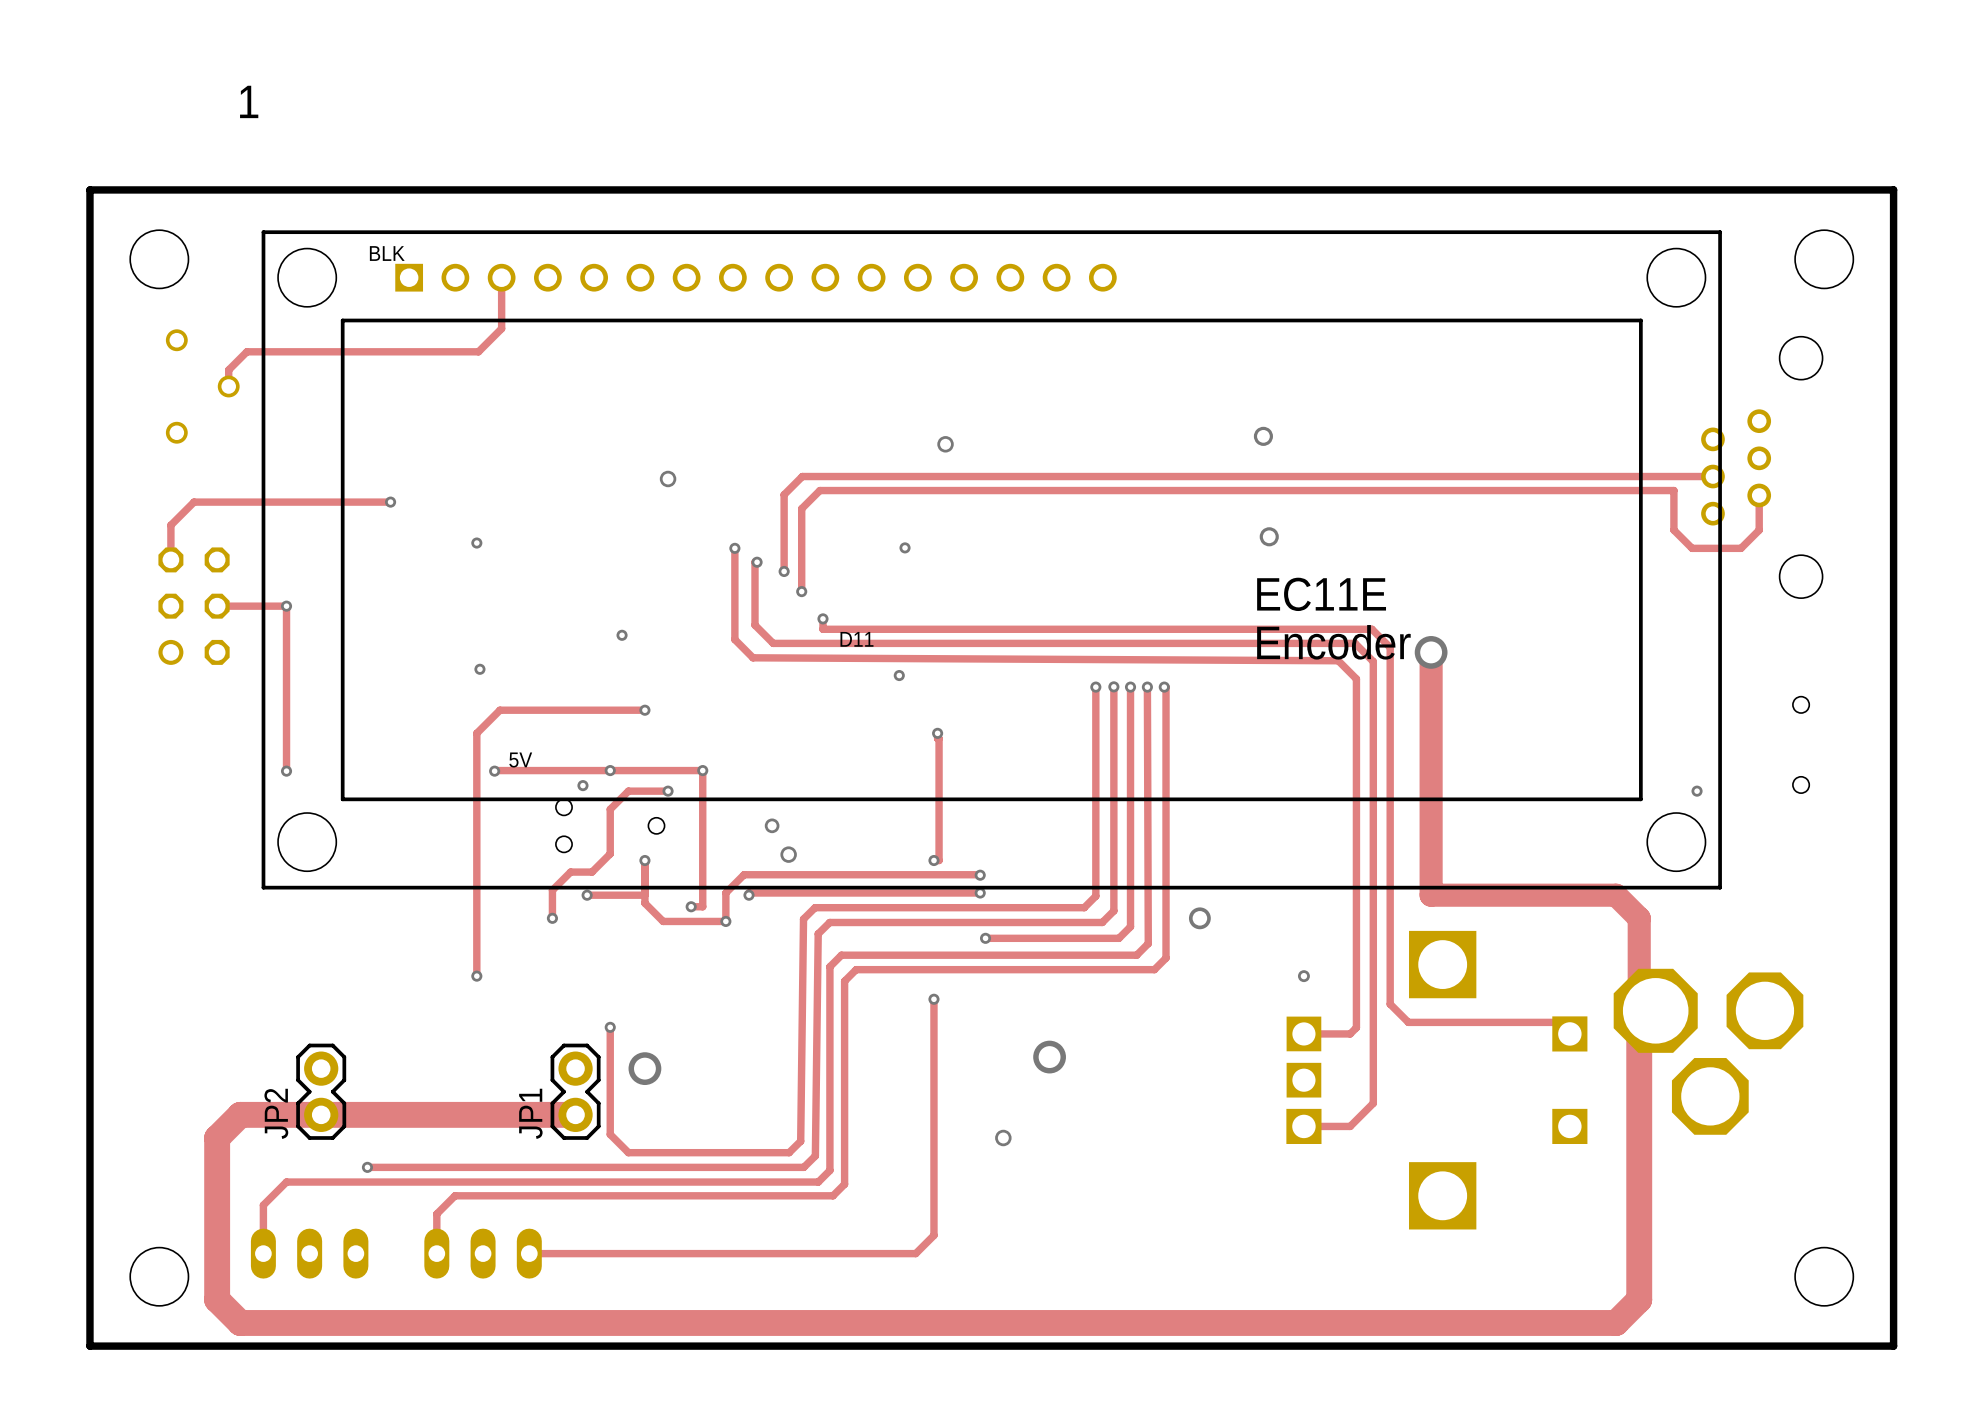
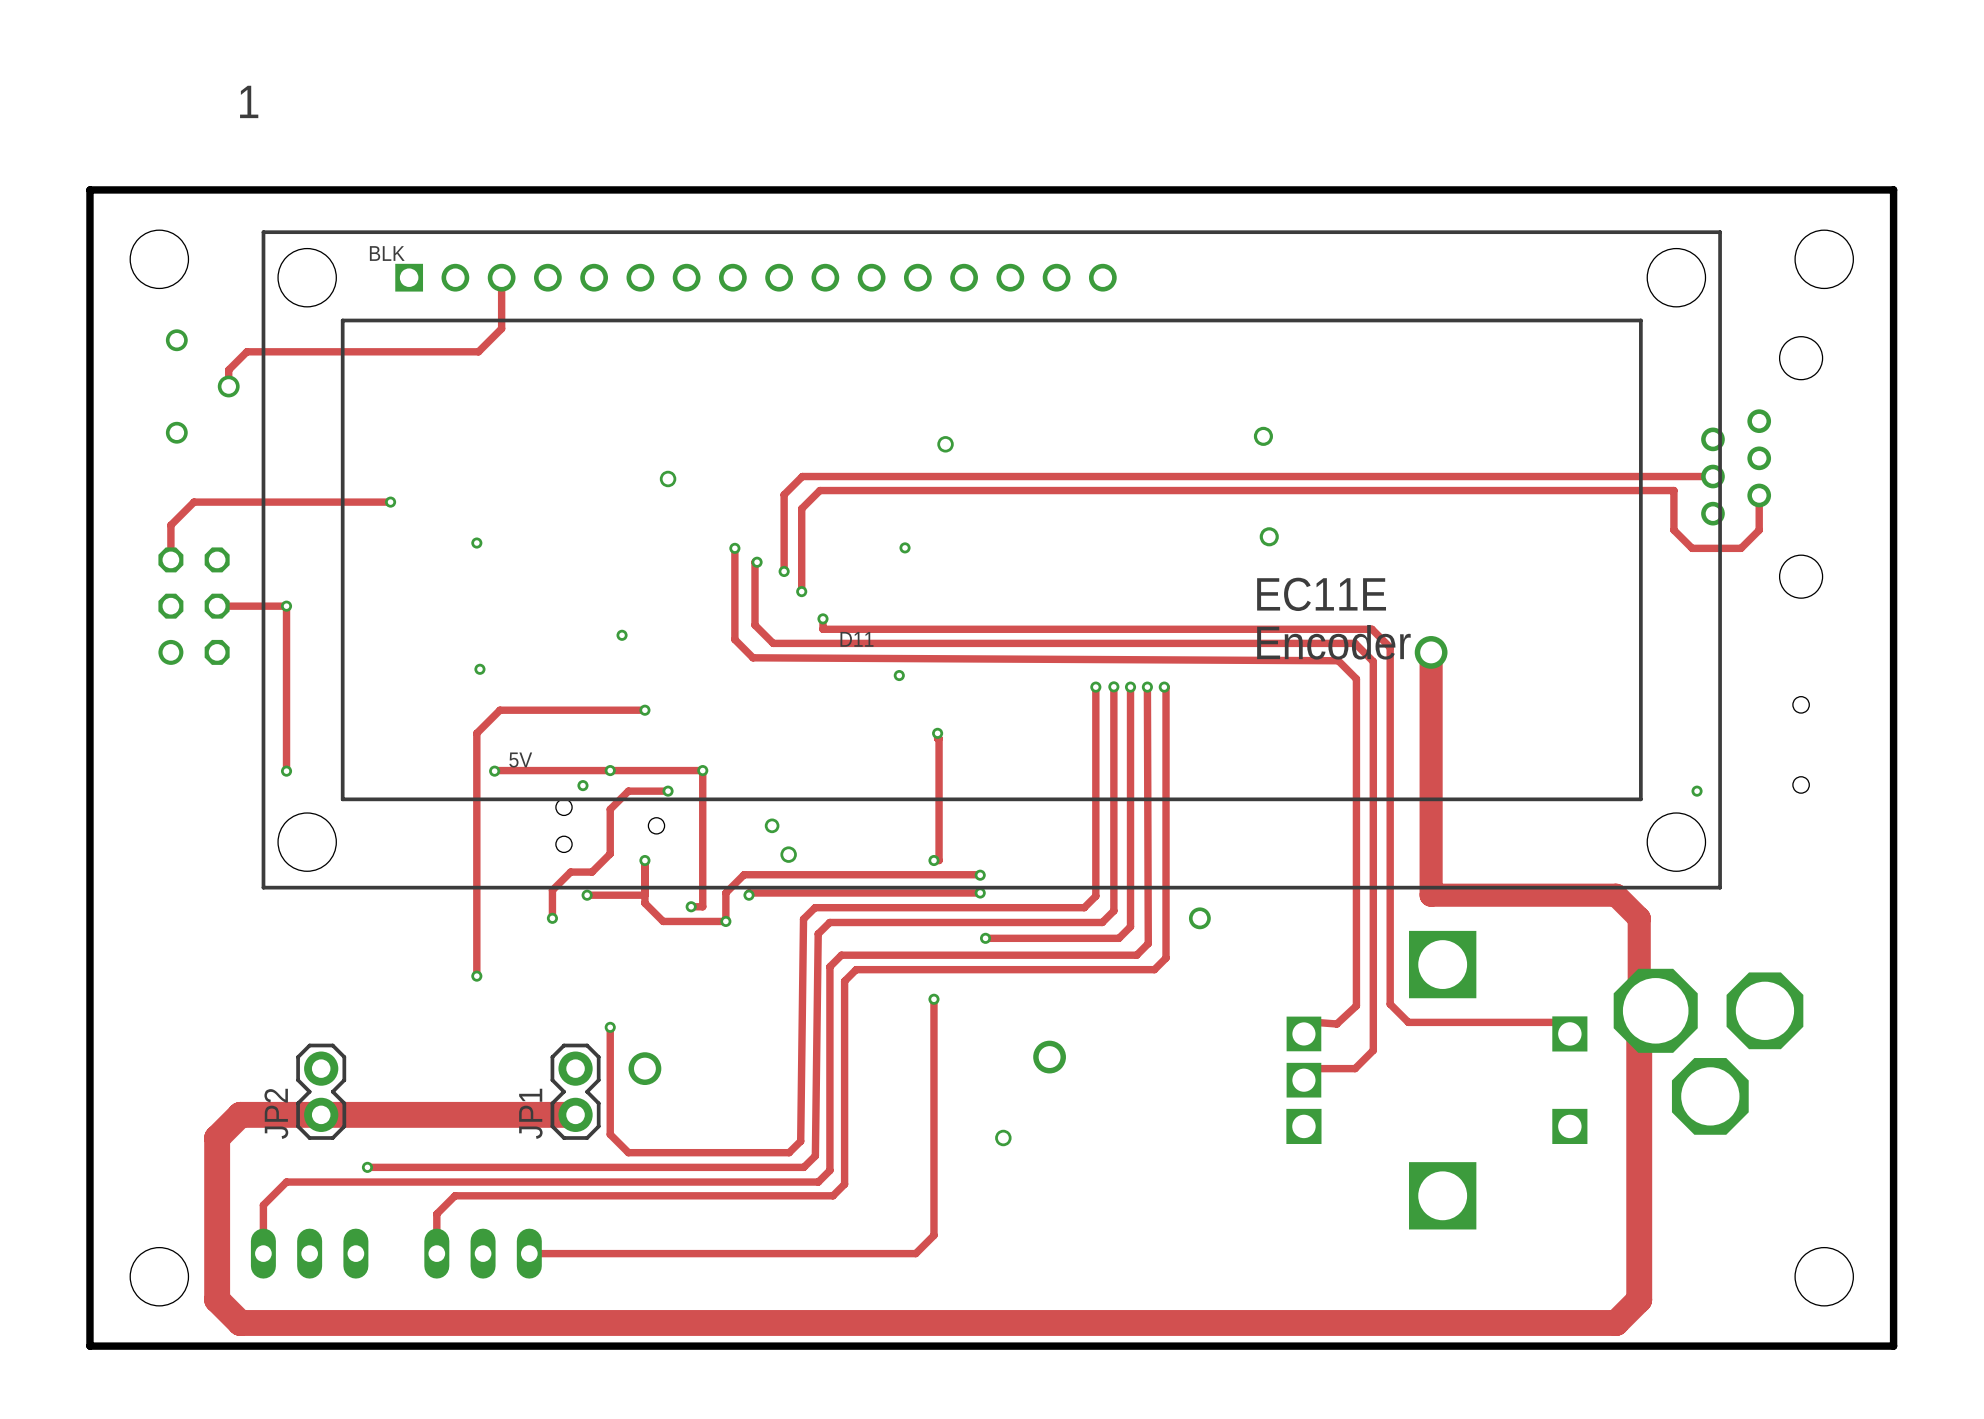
via: (1303, 976) -> none
track: (1356, 1005) (1356, 1027) (1350, 1033) (1303, 1033) -> (1356, 1005) (1336, 1024) (1315, 1023)
track: (1373, 1050) (1373, 1103) (1350, 1126) (1303, 1126) -> (1373, 1050) (1355, 1068) (1315, 1068)

